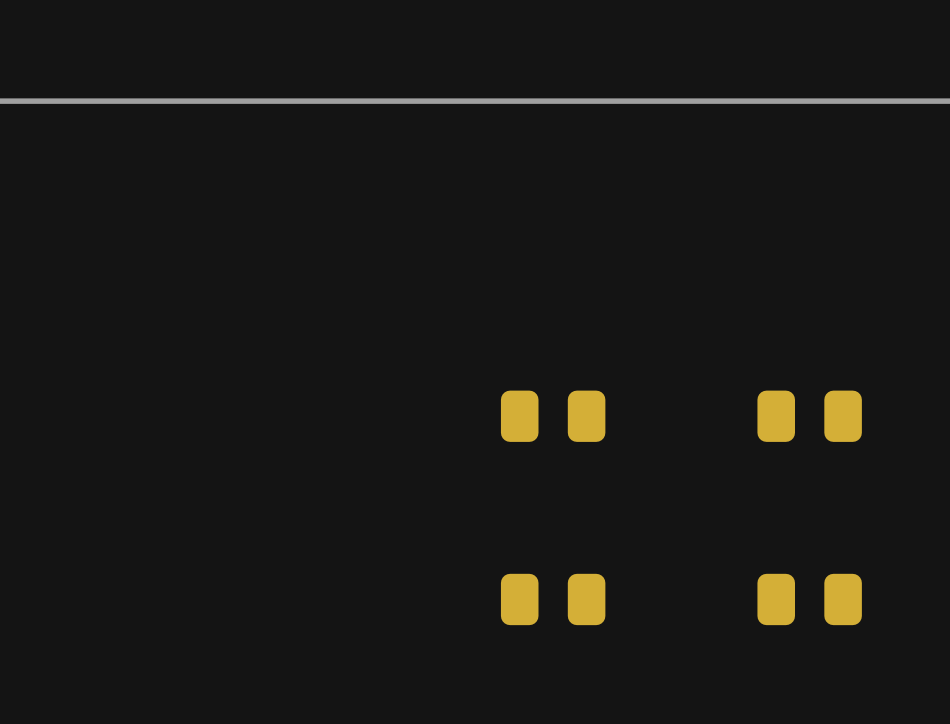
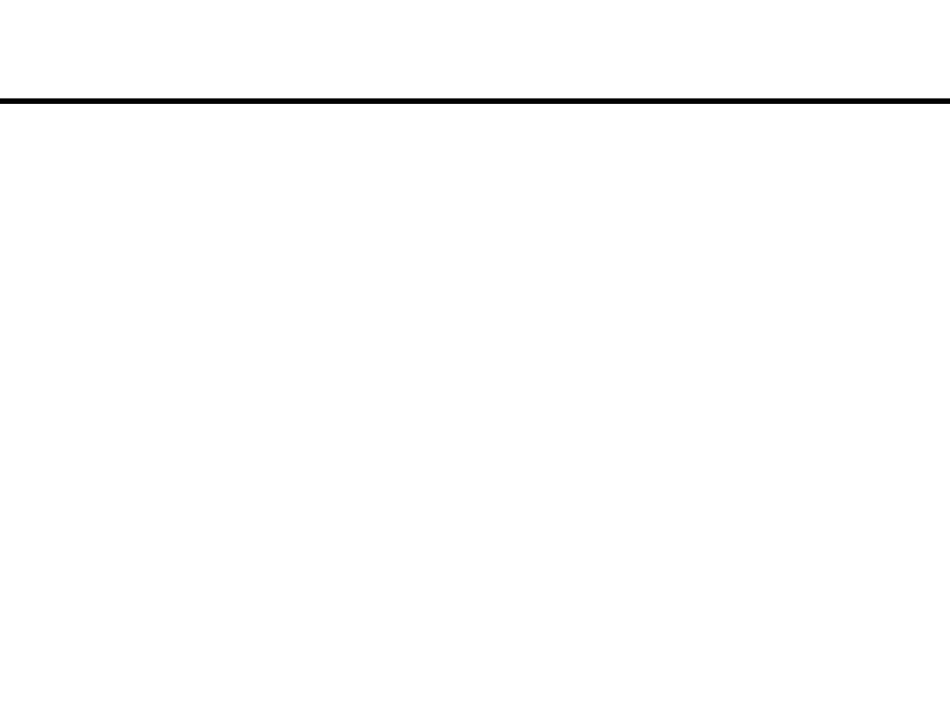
part: (553, 416) -> none
part: (809, 416) -> none
part: (553, 599) -> none
part: (809, 599) -> none

